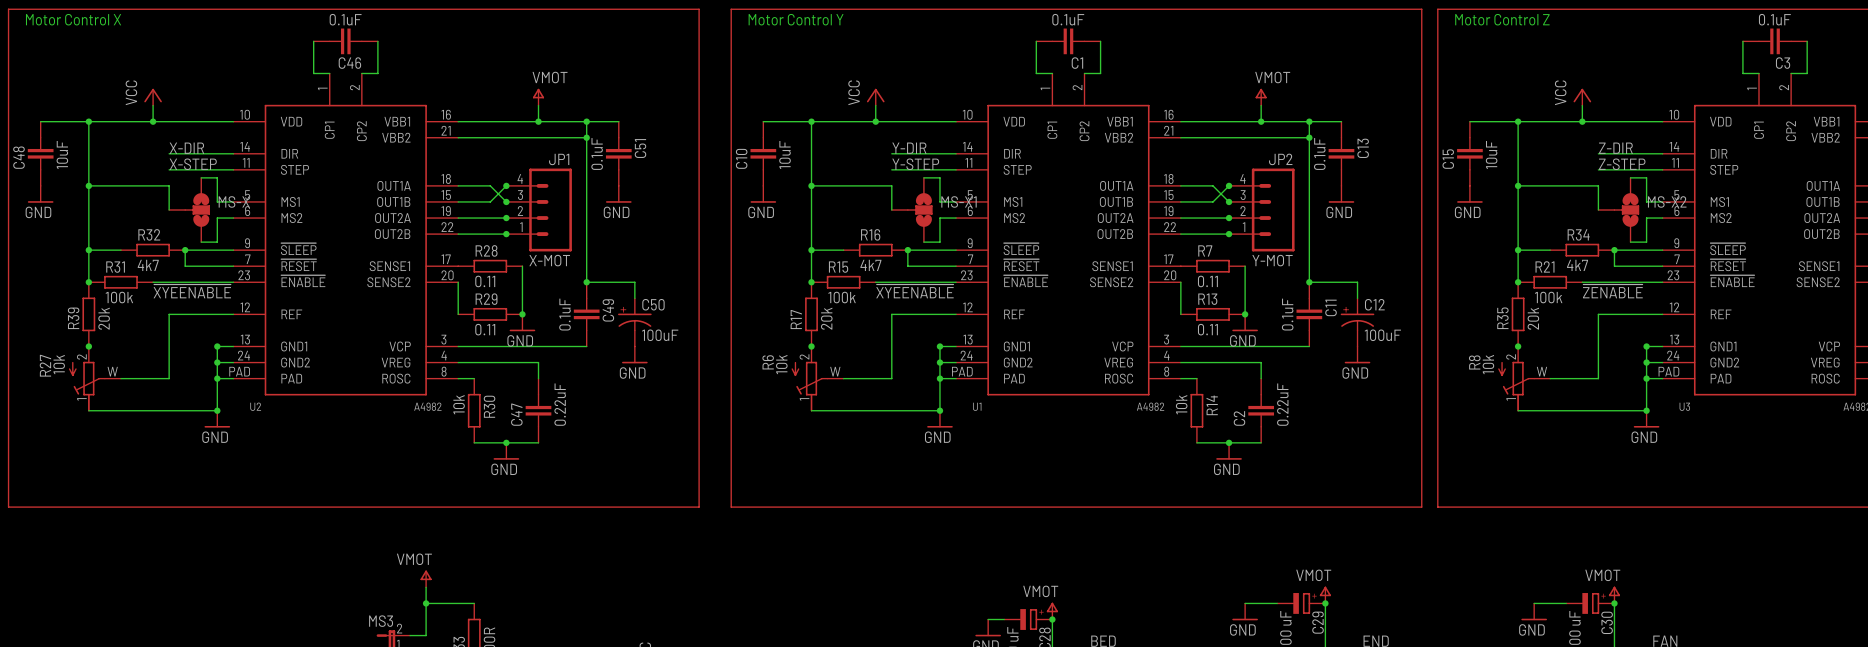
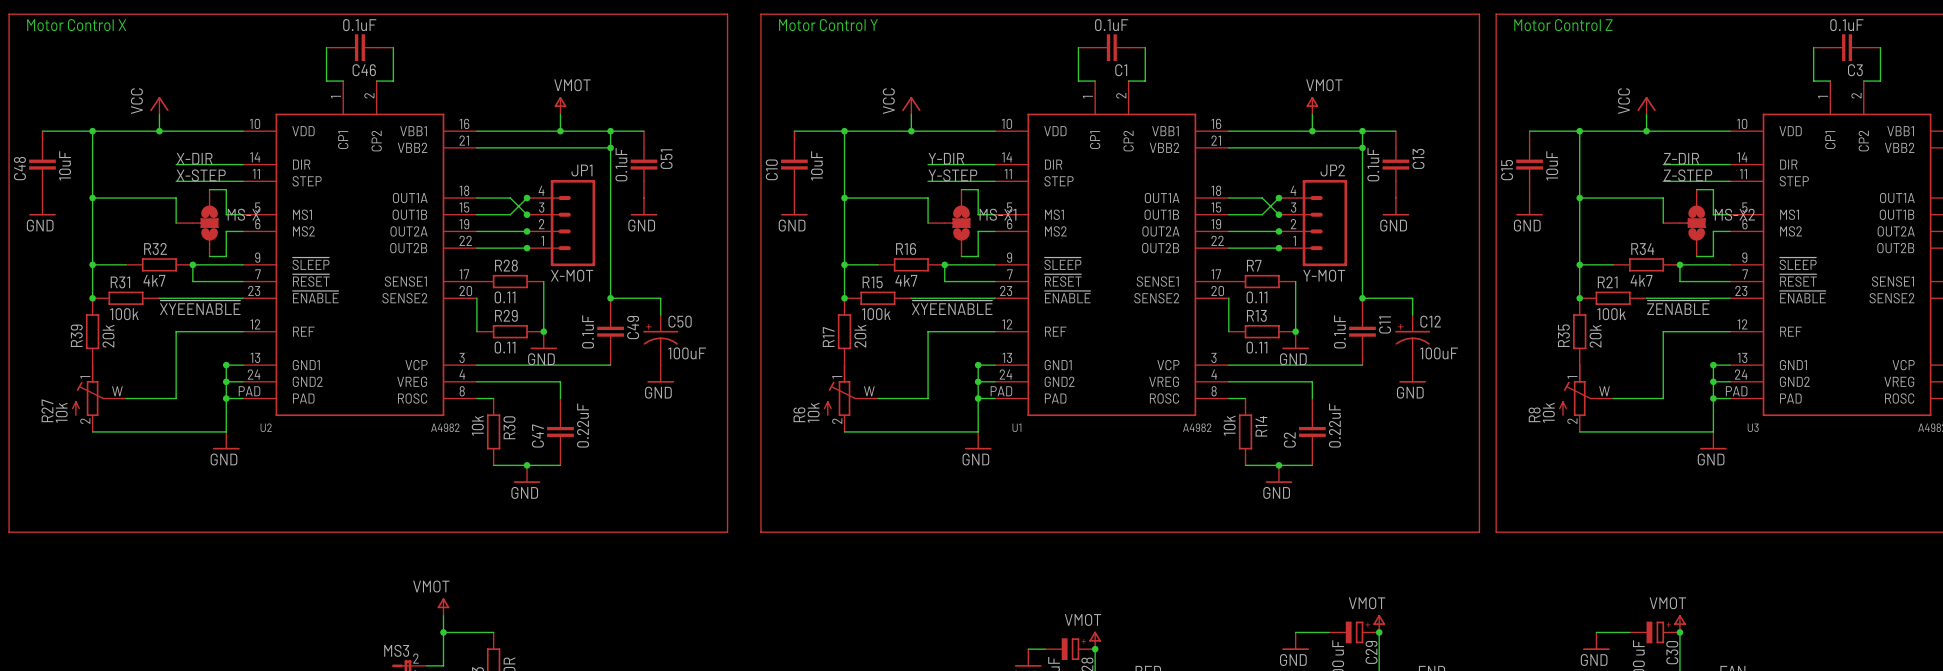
junction: (88, 346) -> none
junction: (811, 346) -> none
junction: (1518, 346) -> none
R27 flip: as is (87, 386) -> up-down (90, 390)
R6 flip: as is (809, 386) -> up-down (842, 390)
R8 flip: as is (1516, 386) -> up-down (1578, 390)
junction: (217, 410) -> none
junction: (939, 410) -> none
junction: (1646, 410) -> none

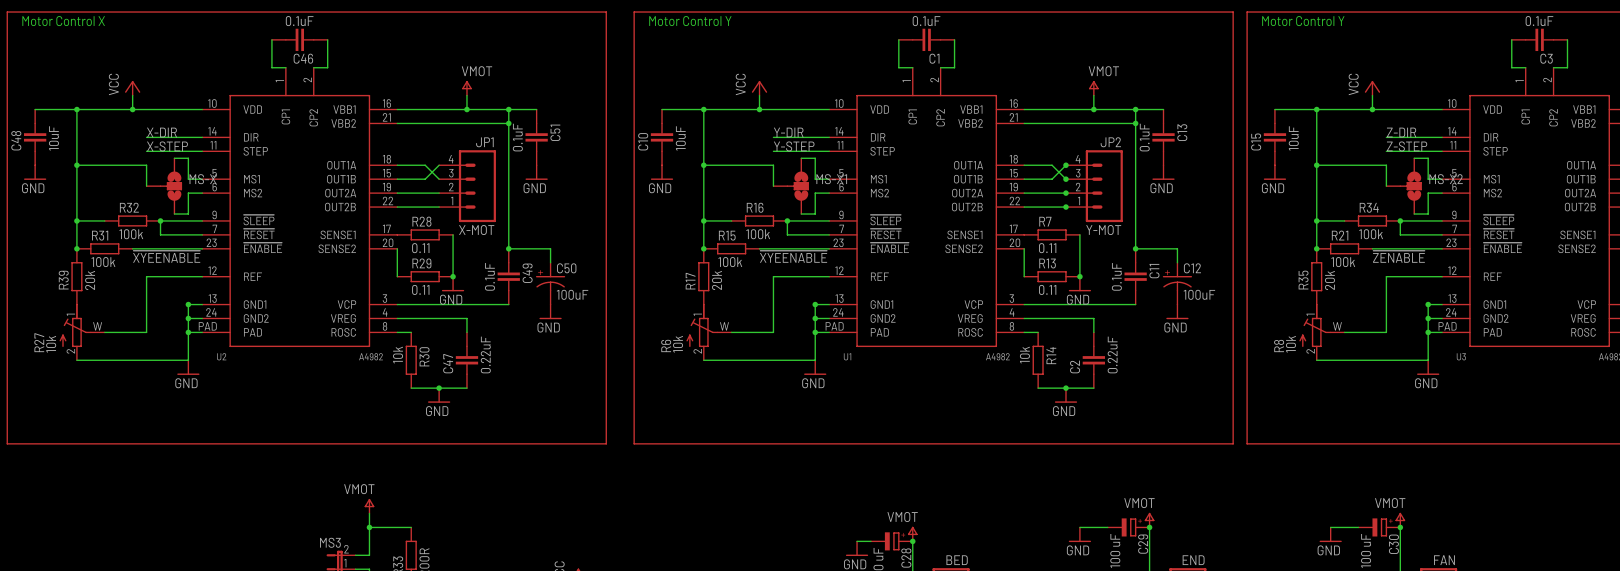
text: Motor Control Z (1563, 25) -> Motor Control Y (1303, 21)
junction: (527, 198) -> none
junction: (527, 214) -> none
junction: (527, 231) -> none
junction: (527, 248) -> none
R32 value: 4k7 (154, 280) -> 100k (131, 234)
R16 value: 4k7 (906, 280) -> 100k (758, 234)
R34 value: 4k7 (1641, 280) -> 100k (1371, 234)

